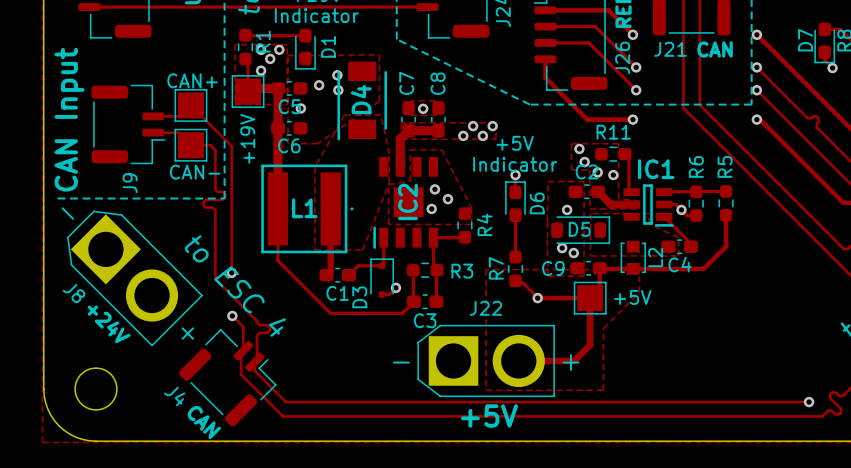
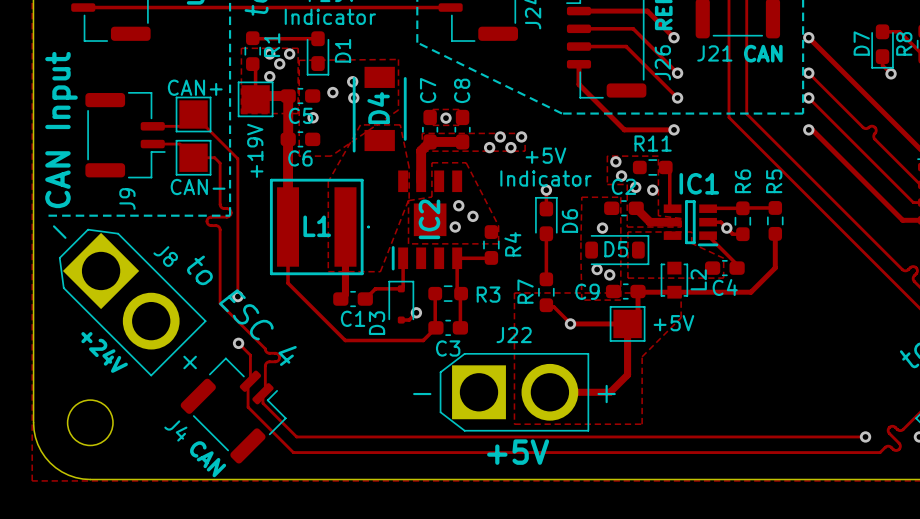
J8 name position: J8 (74, 293) -> J8 (165, 256)

